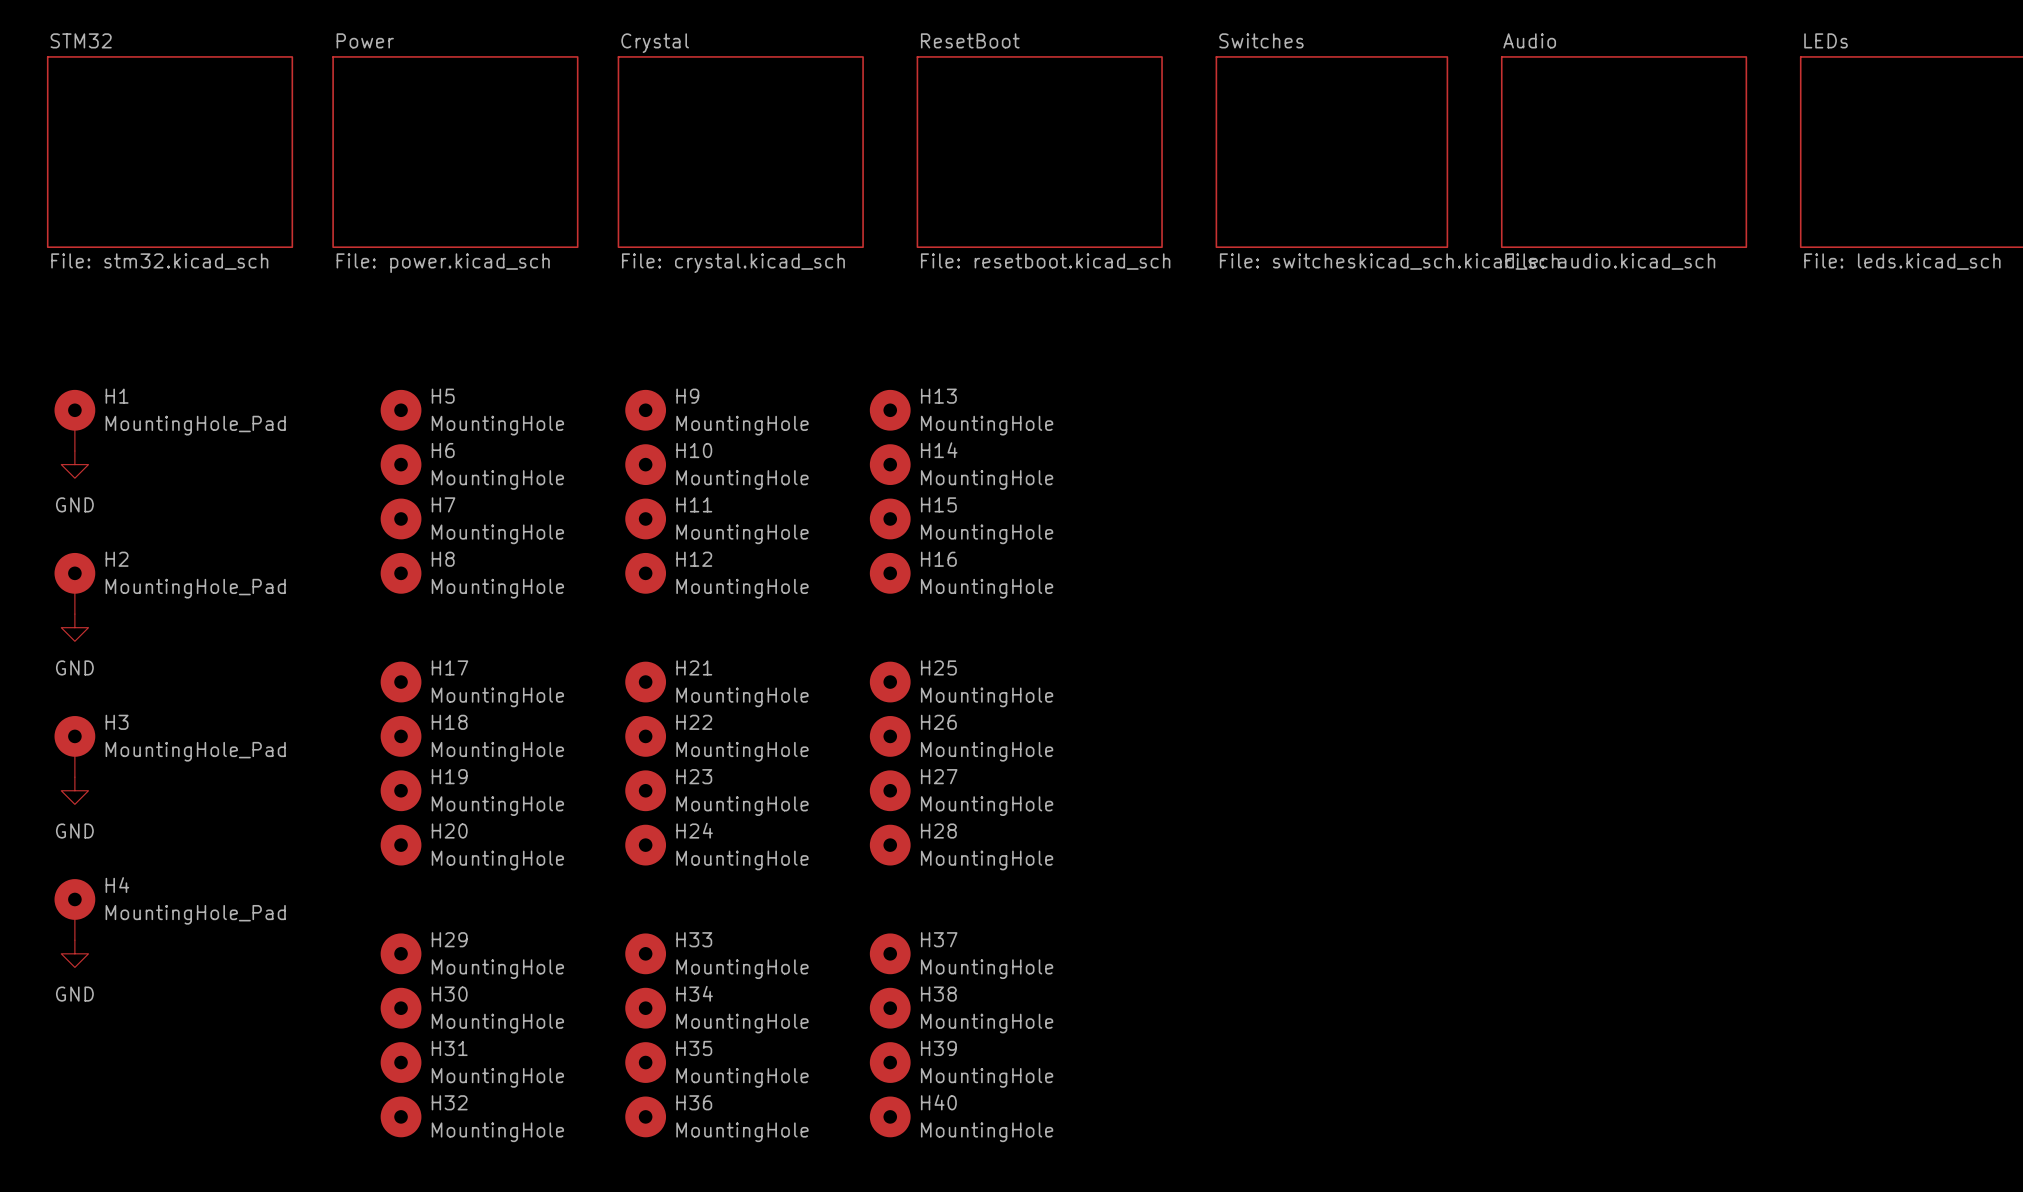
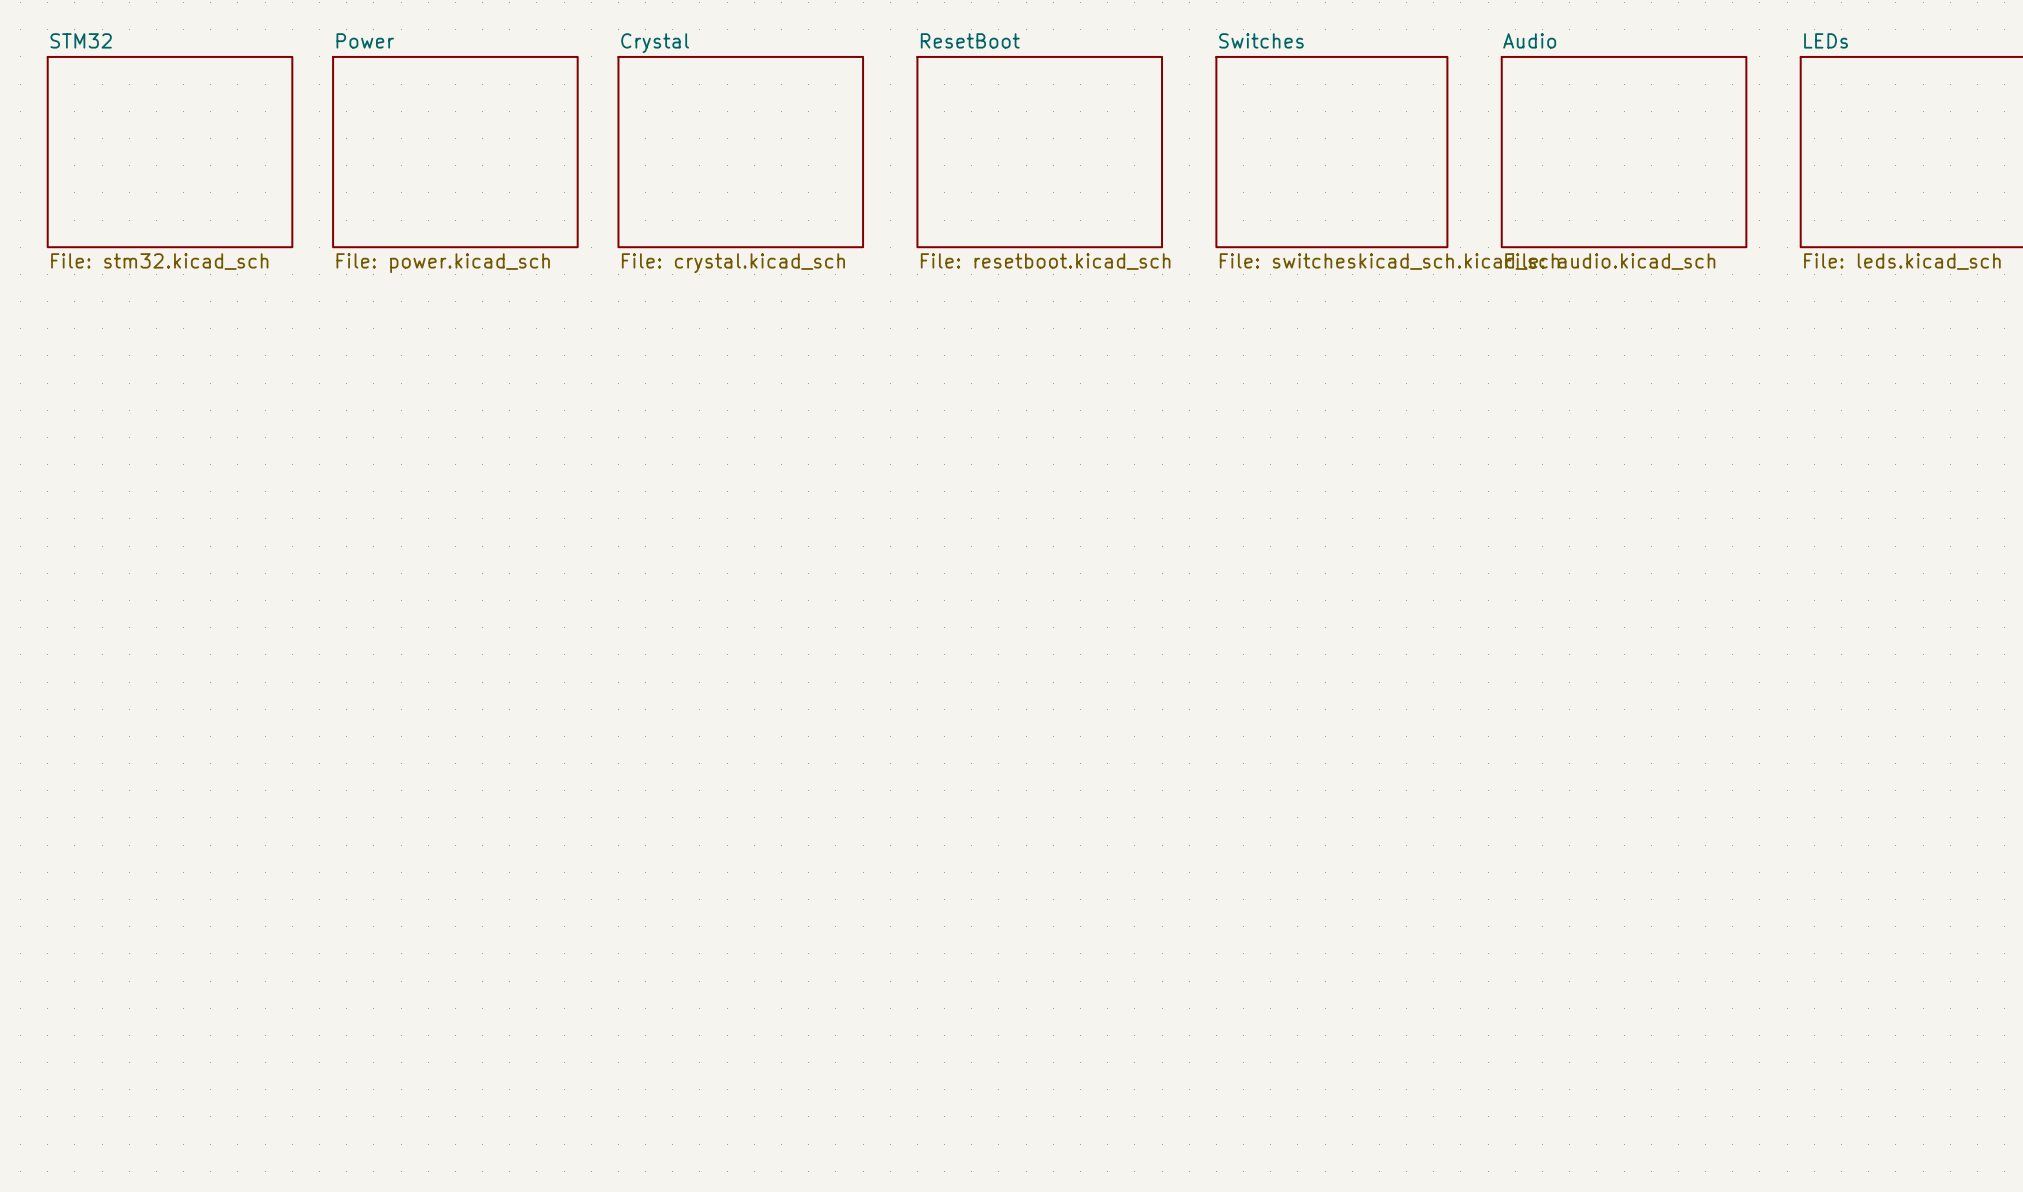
H5: MountingHole (401, 410) -> none
H9: MountingHole (645, 410) -> none
H13: MountingHole (890, 410) -> none
H1: MountingHole_Pad (74, 420) -> none
power symbol: GND (74, 464) -> none
H6: MountingHole (401, 464) -> none
H10: MountingHole (645, 464) -> none
H14: MountingHole (890, 464) -> none
H7: MountingHole (401, 518) -> none
H11: MountingHole (645, 518) -> none
H15: MountingHole (890, 518) -> none
H8: MountingHole (401, 573) -> none
H12: MountingHole (645, 573) -> none
H16: MountingHole (890, 573) -> none
H2: MountingHole_Pad (74, 583) -> none
power symbol: GND (74, 627) -> none
H17: MountingHole (401, 682) -> none
H21: MountingHole (645, 682) -> none
H25: MountingHole (890, 682) -> none
H18: MountingHole (401, 736) -> none
H22: MountingHole (645, 736) -> none
H26: MountingHole (890, 736) -> none
H3: MountingHole_Pad (74, 746) -> none
power symbol: GND (74, 790) -> none
H19: MountingHole (401, 790) -> none
H23: MountingHole (645, 790) -> none
H27: MountingHole (890, 790) -> none
H20: MountingHole (401, 845) -> none
H24: MountingHole (645, 845) -> none
H28: MountingHole (890, 845) -> none
H4: MountingHole_Pad (74, 909) -> none
power symbol: GND (74, 953) -> none
H29: MountingHole (401, 953) -> none
H33: MountingHole (645, 953) -> none
H37: MountingHole (890, 953) -> none
H30: MountingHole (401, 1008) -> none
H34: MountingHole (645, 1008) -> none
H38: MountingHole (890, 1008) -> none
H31: MountingHole (401, 1062) -> none
H35: MountingHole (645, 1062) -> none
H39: MountingHole (890, 1062) -> none
H32: MountingHole (401, 1116) -> none
H36: MountingHole (645, 1116) -> none
H40: MountingHole (890, 1116) -> none

